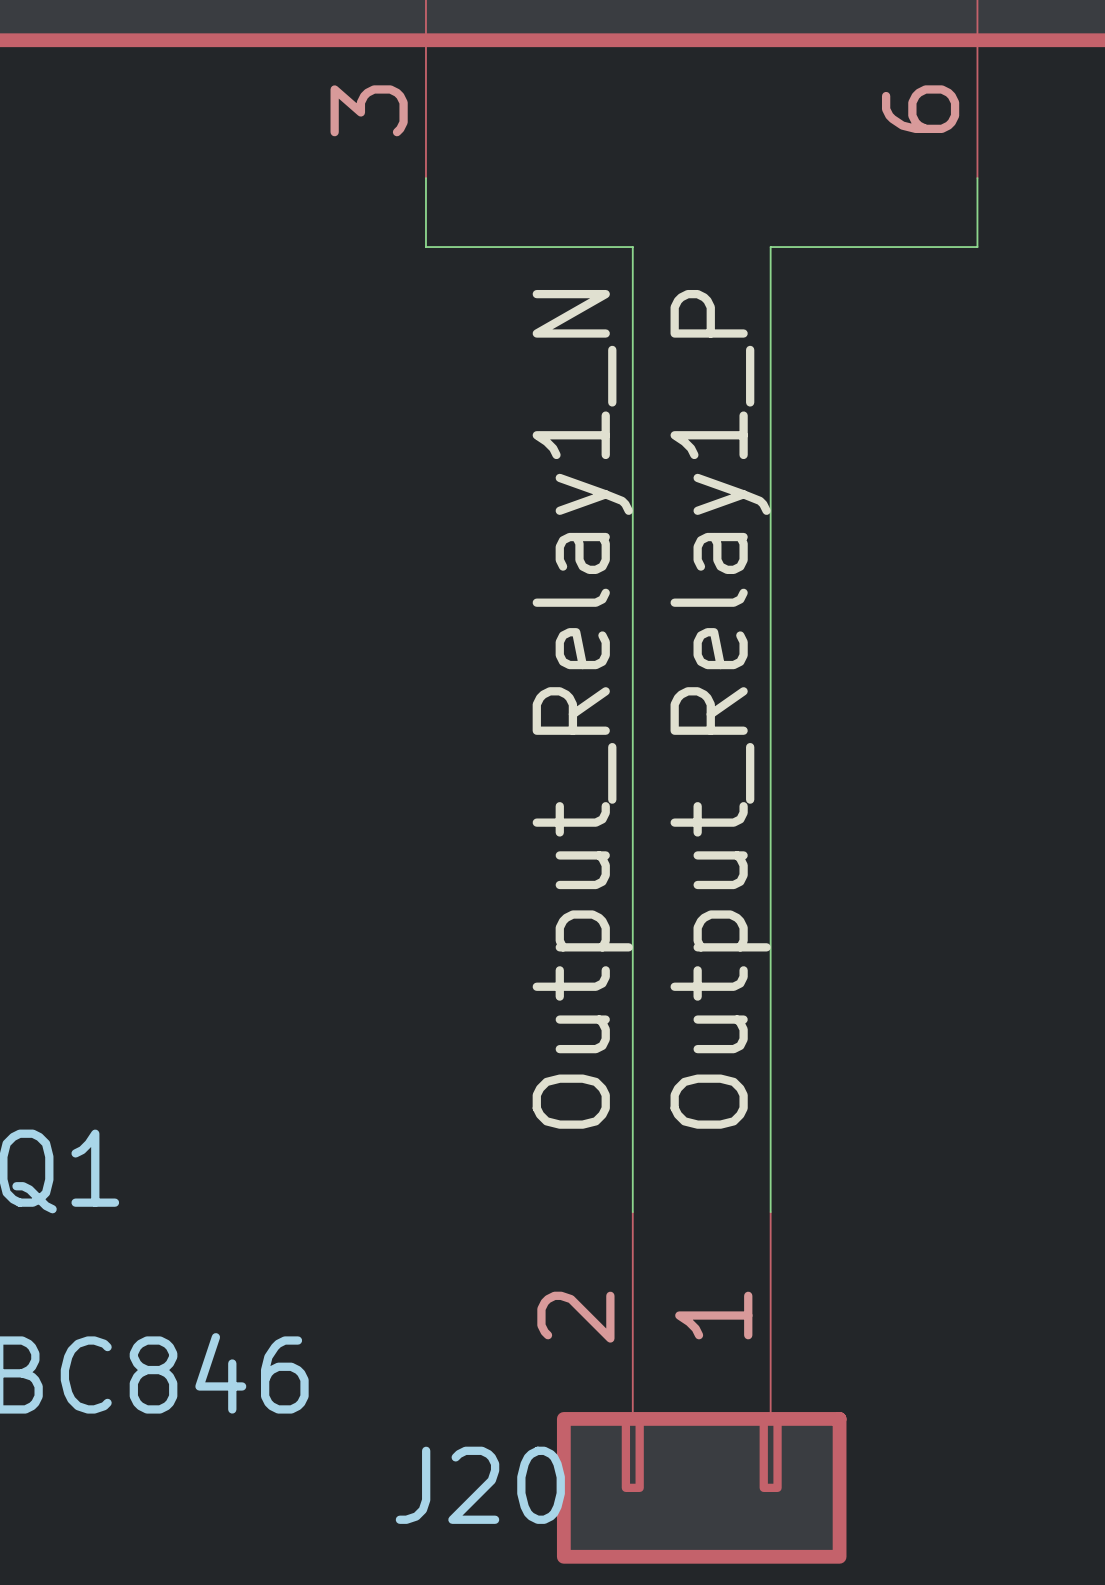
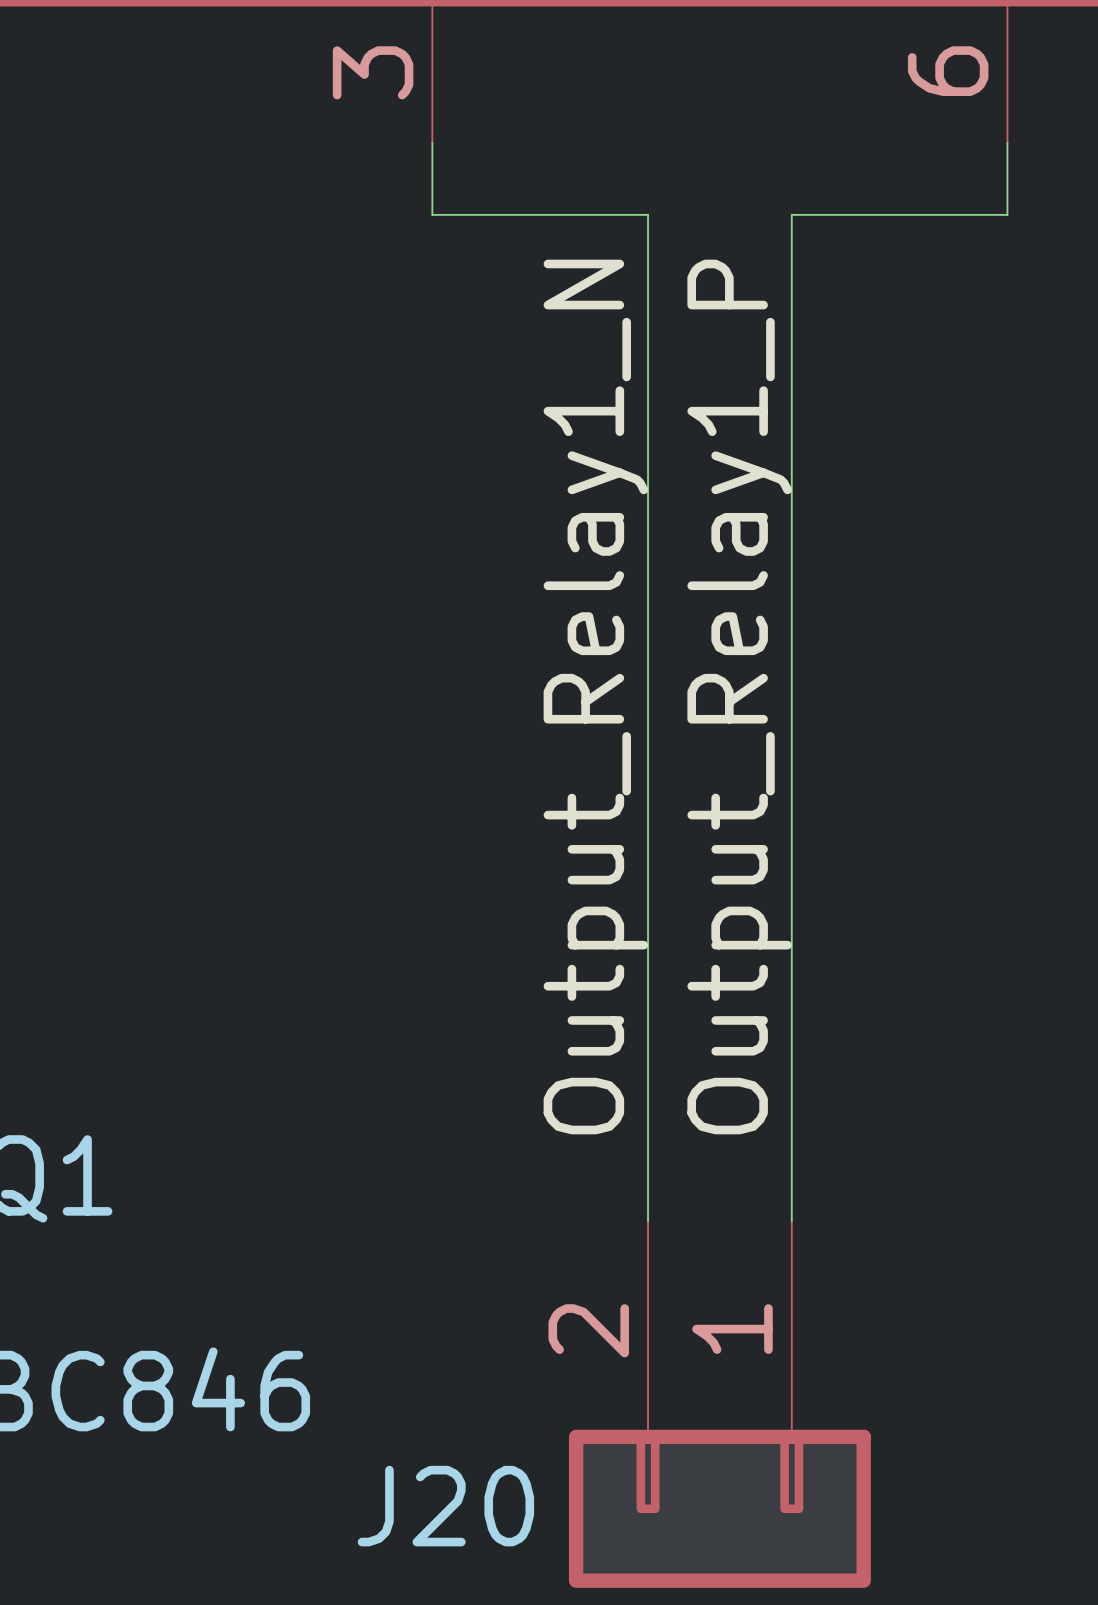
J20 name position: J20 (480, 1485) -> J20 (445, 1506)

